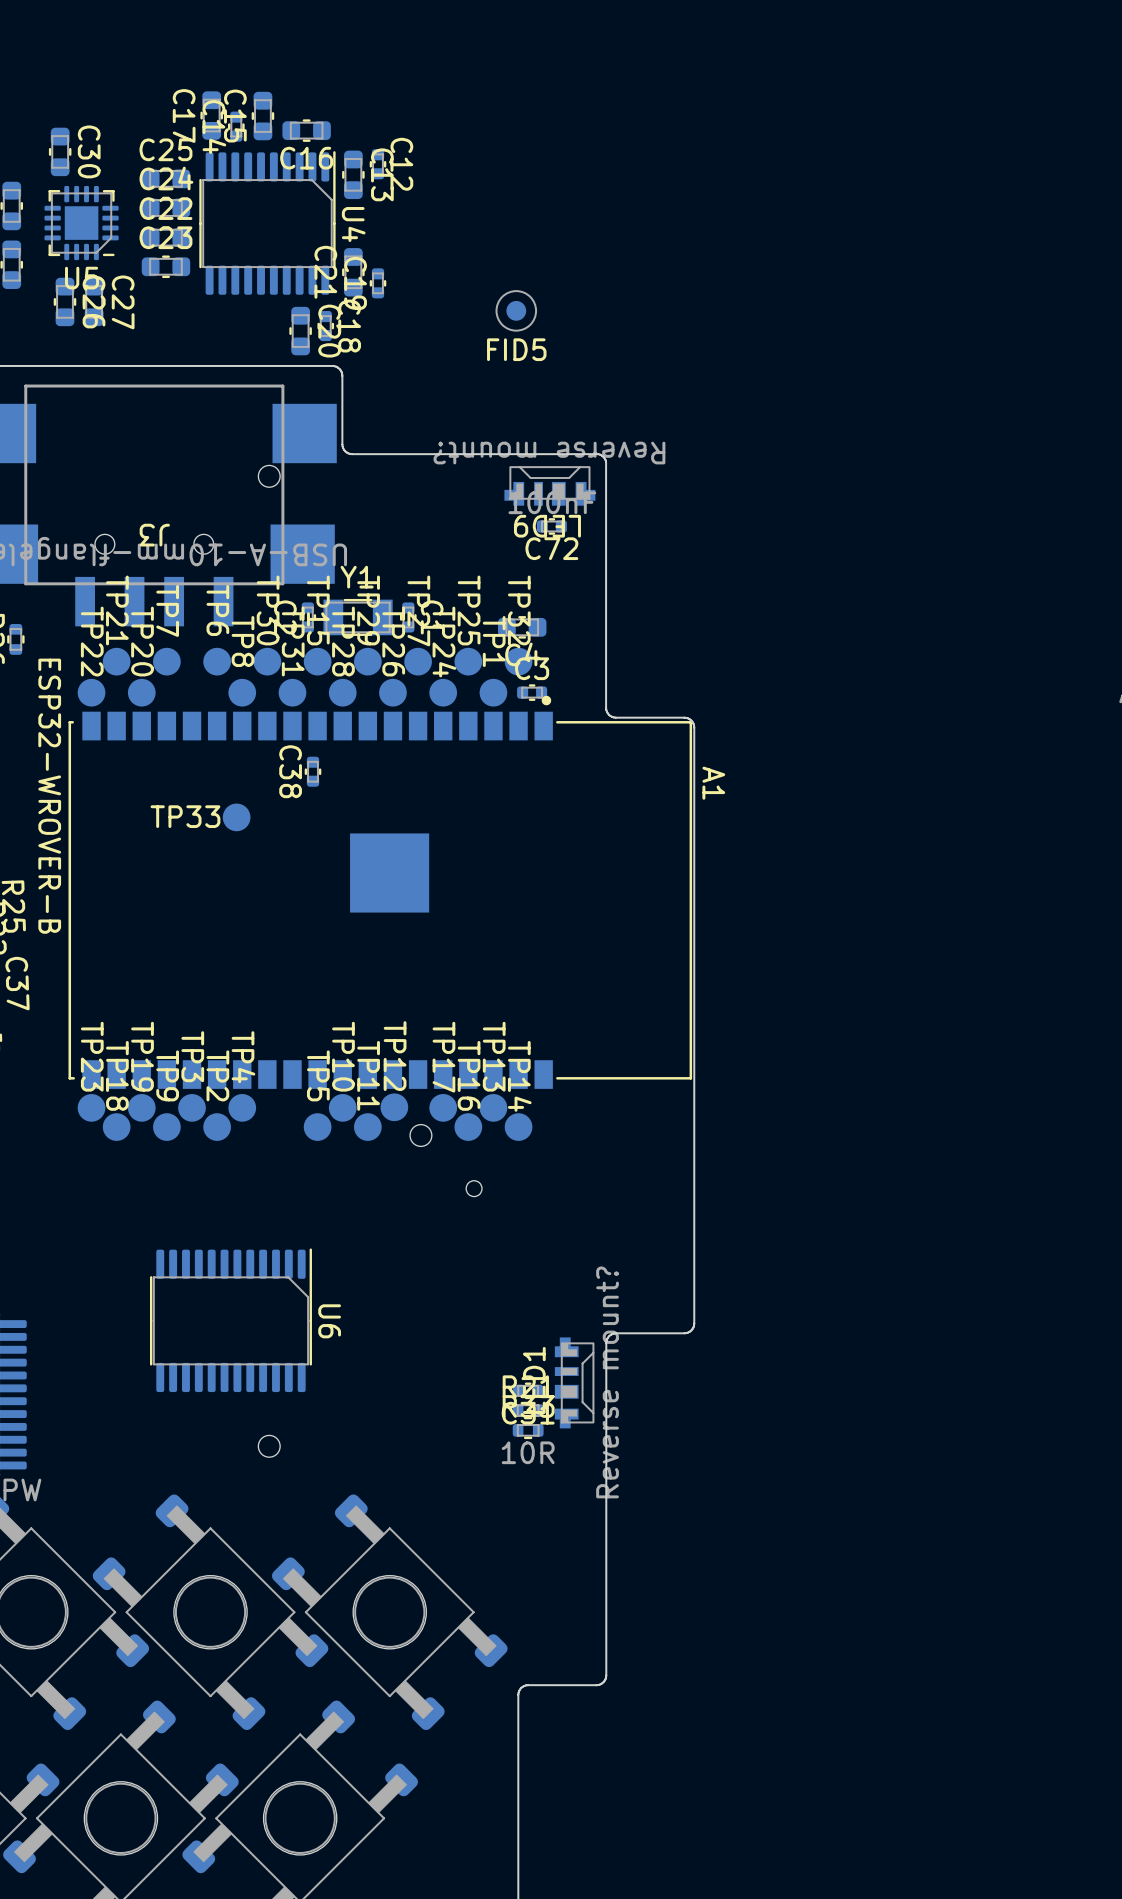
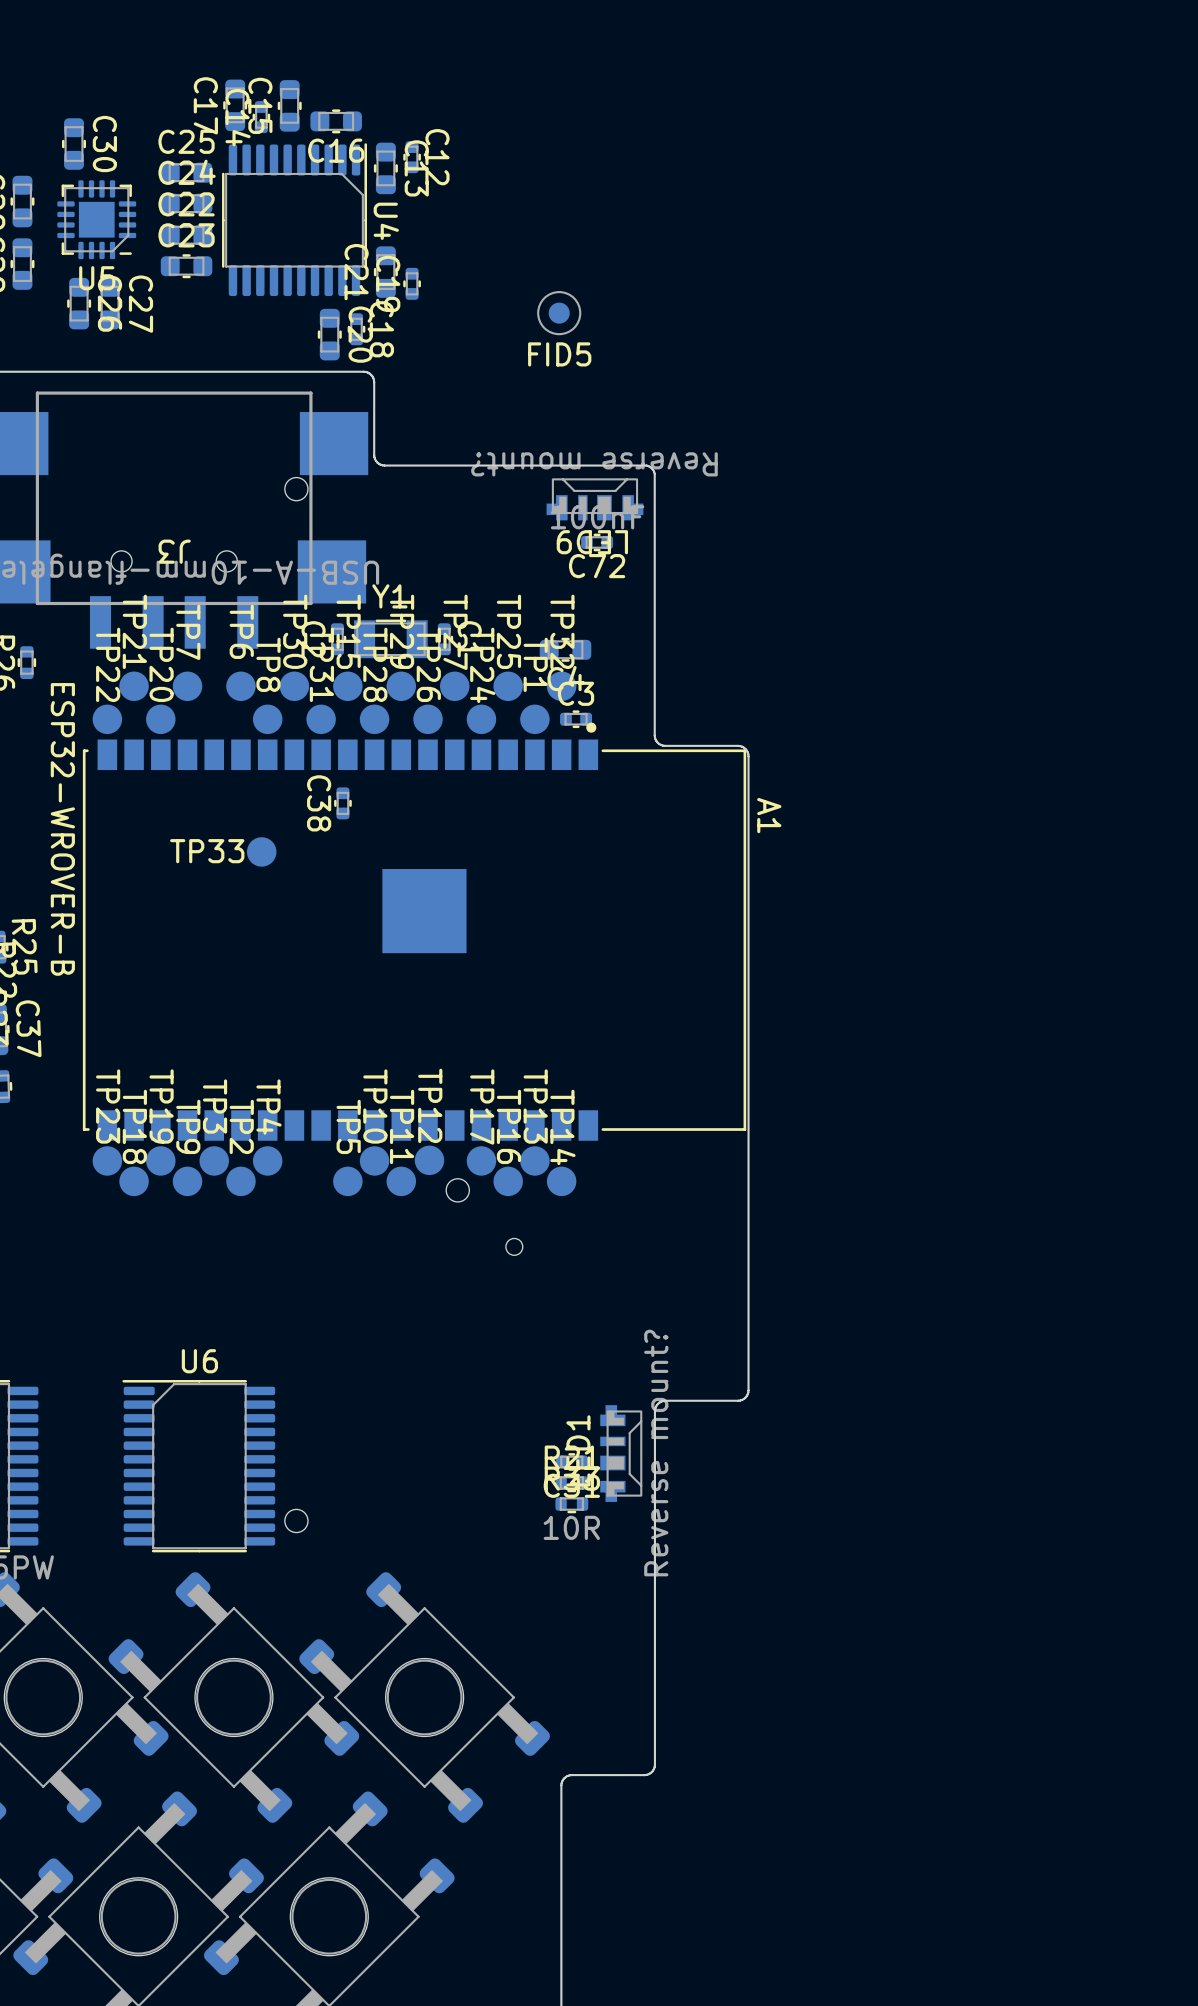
U6 rotation: 0° (230, 1320) -> 90° counterclockwise (198, 1466)

